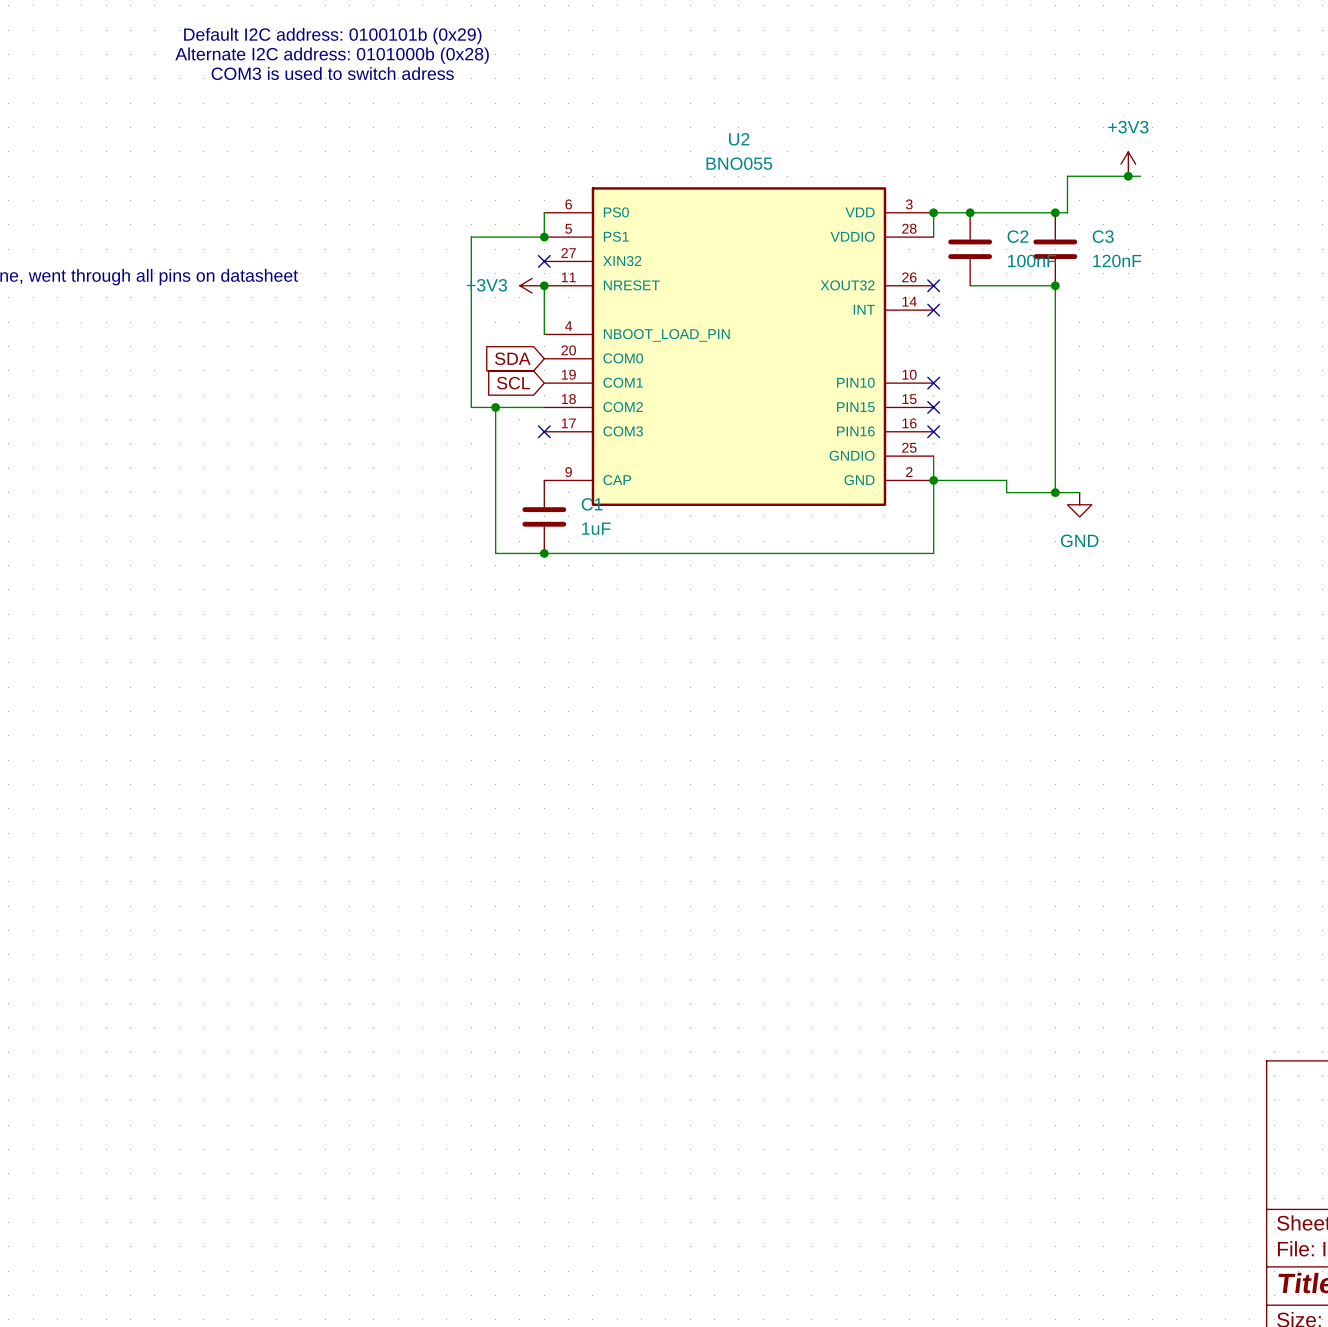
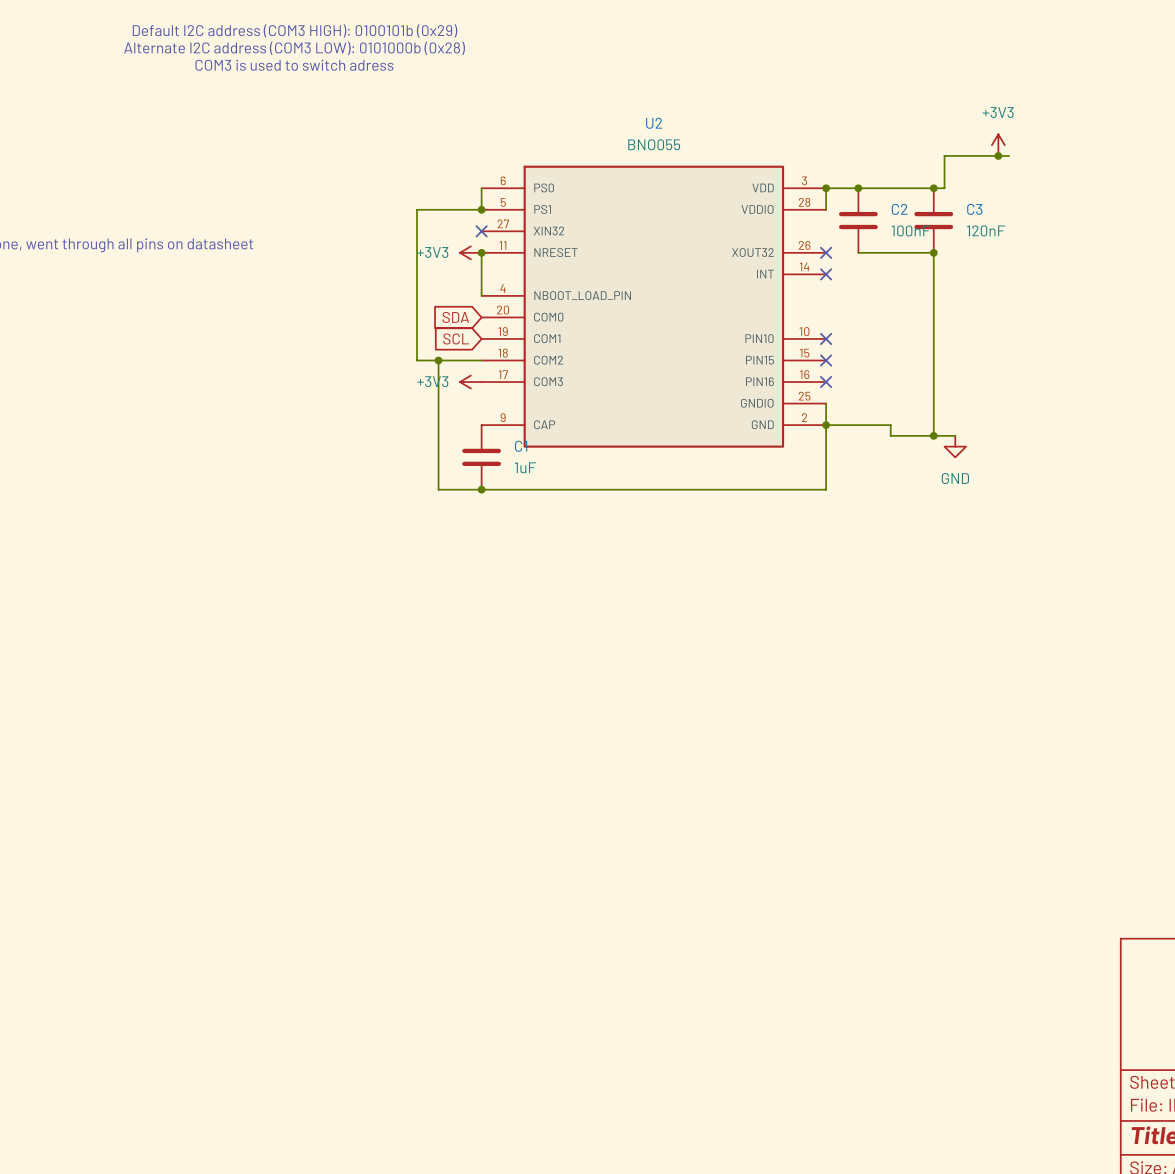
text: Default I2C address: 0100101b (0x29) (332, 36) -> Default I2C address (COM3 HIGH): 0100101b (0x29) (295, 30)
text: Alternate I2C address: 0101000b (0x28) (332, 55) -> Alternate I2C address (COM3 LOW): 0101000b (0x28) (294, 48)
power symbol: none -> +3V3 (470, 382)
no-connect mark: (544, 431) -> none

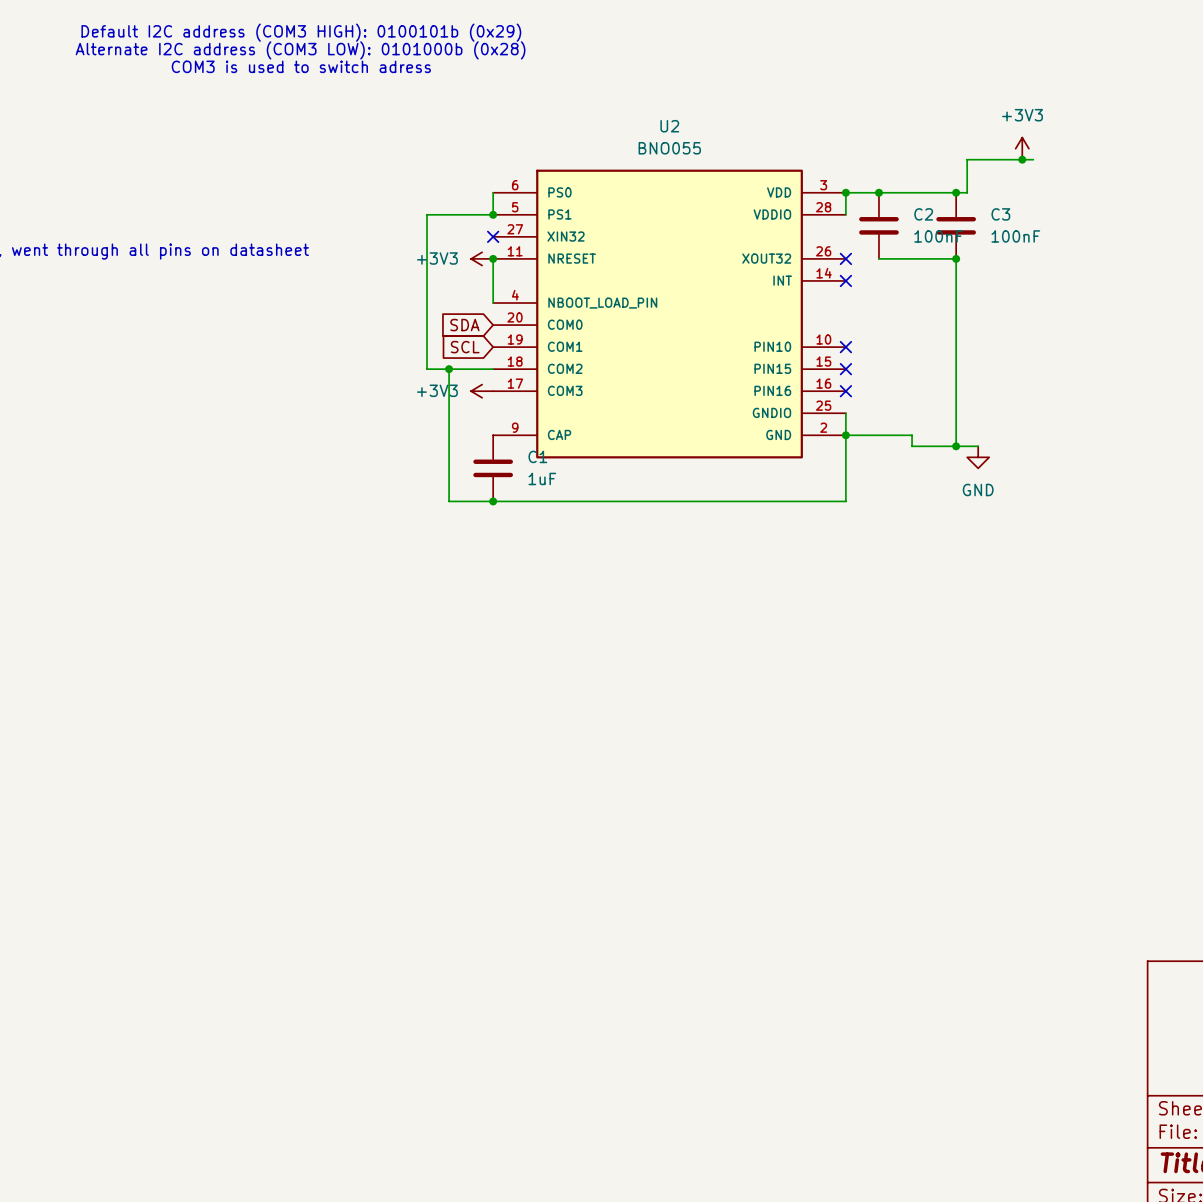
C3 value: 120nF (986, 230) -> 100nF (1015, 236)

